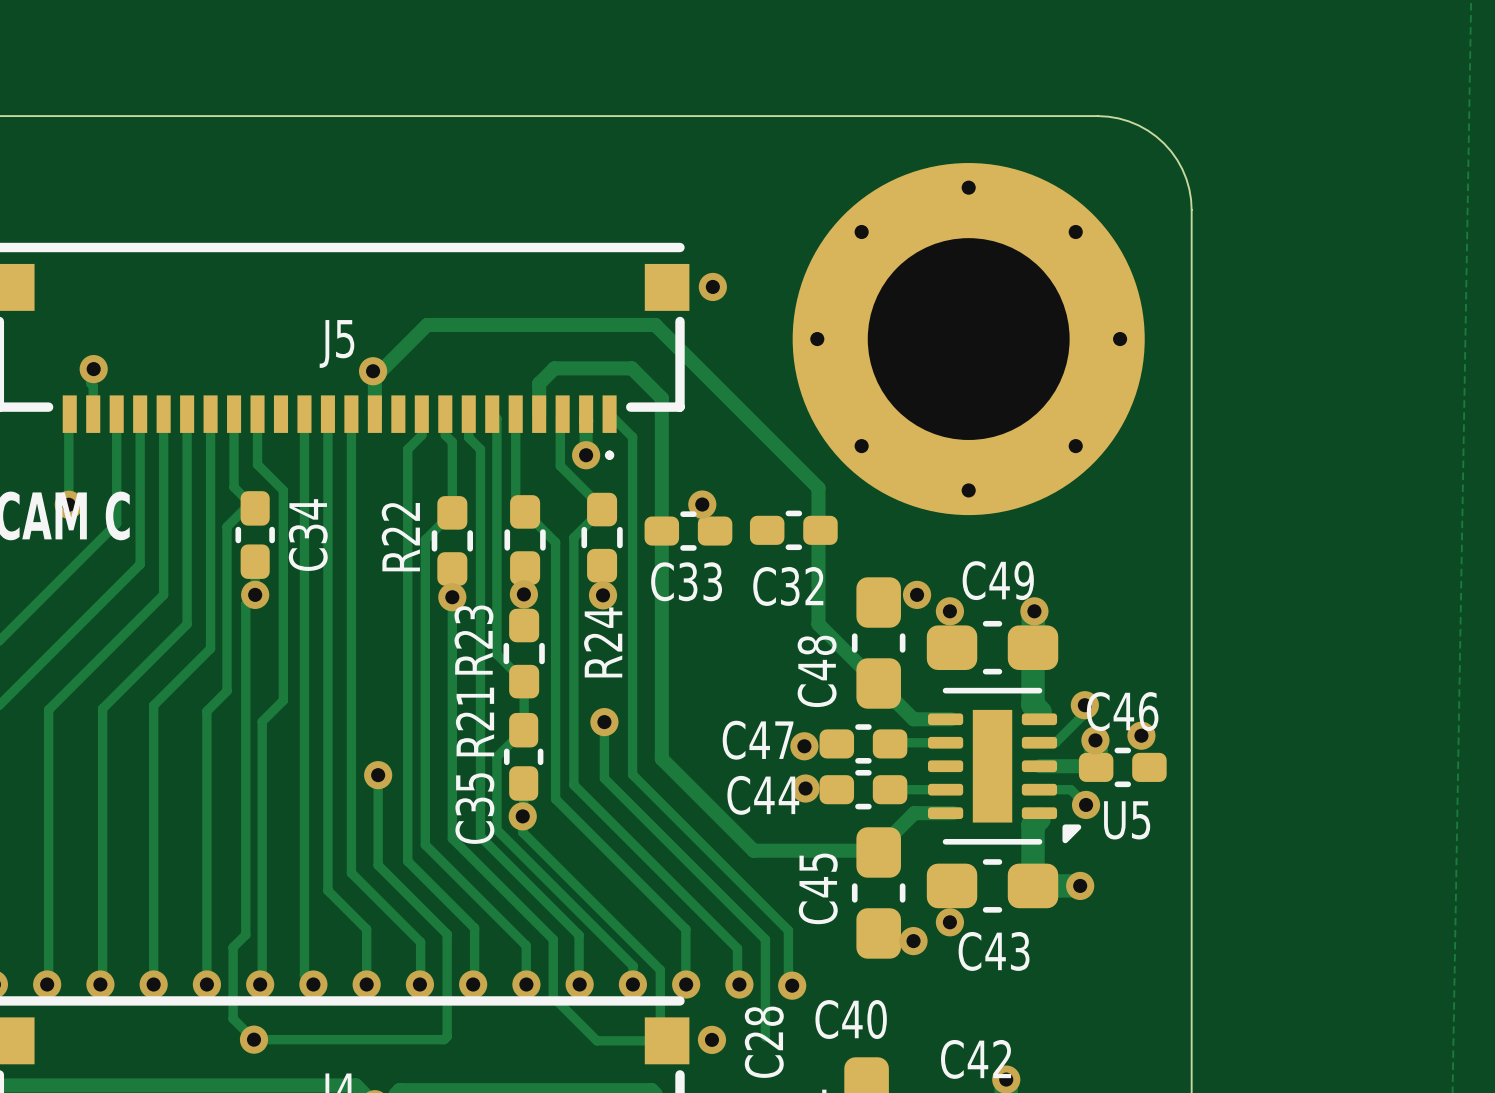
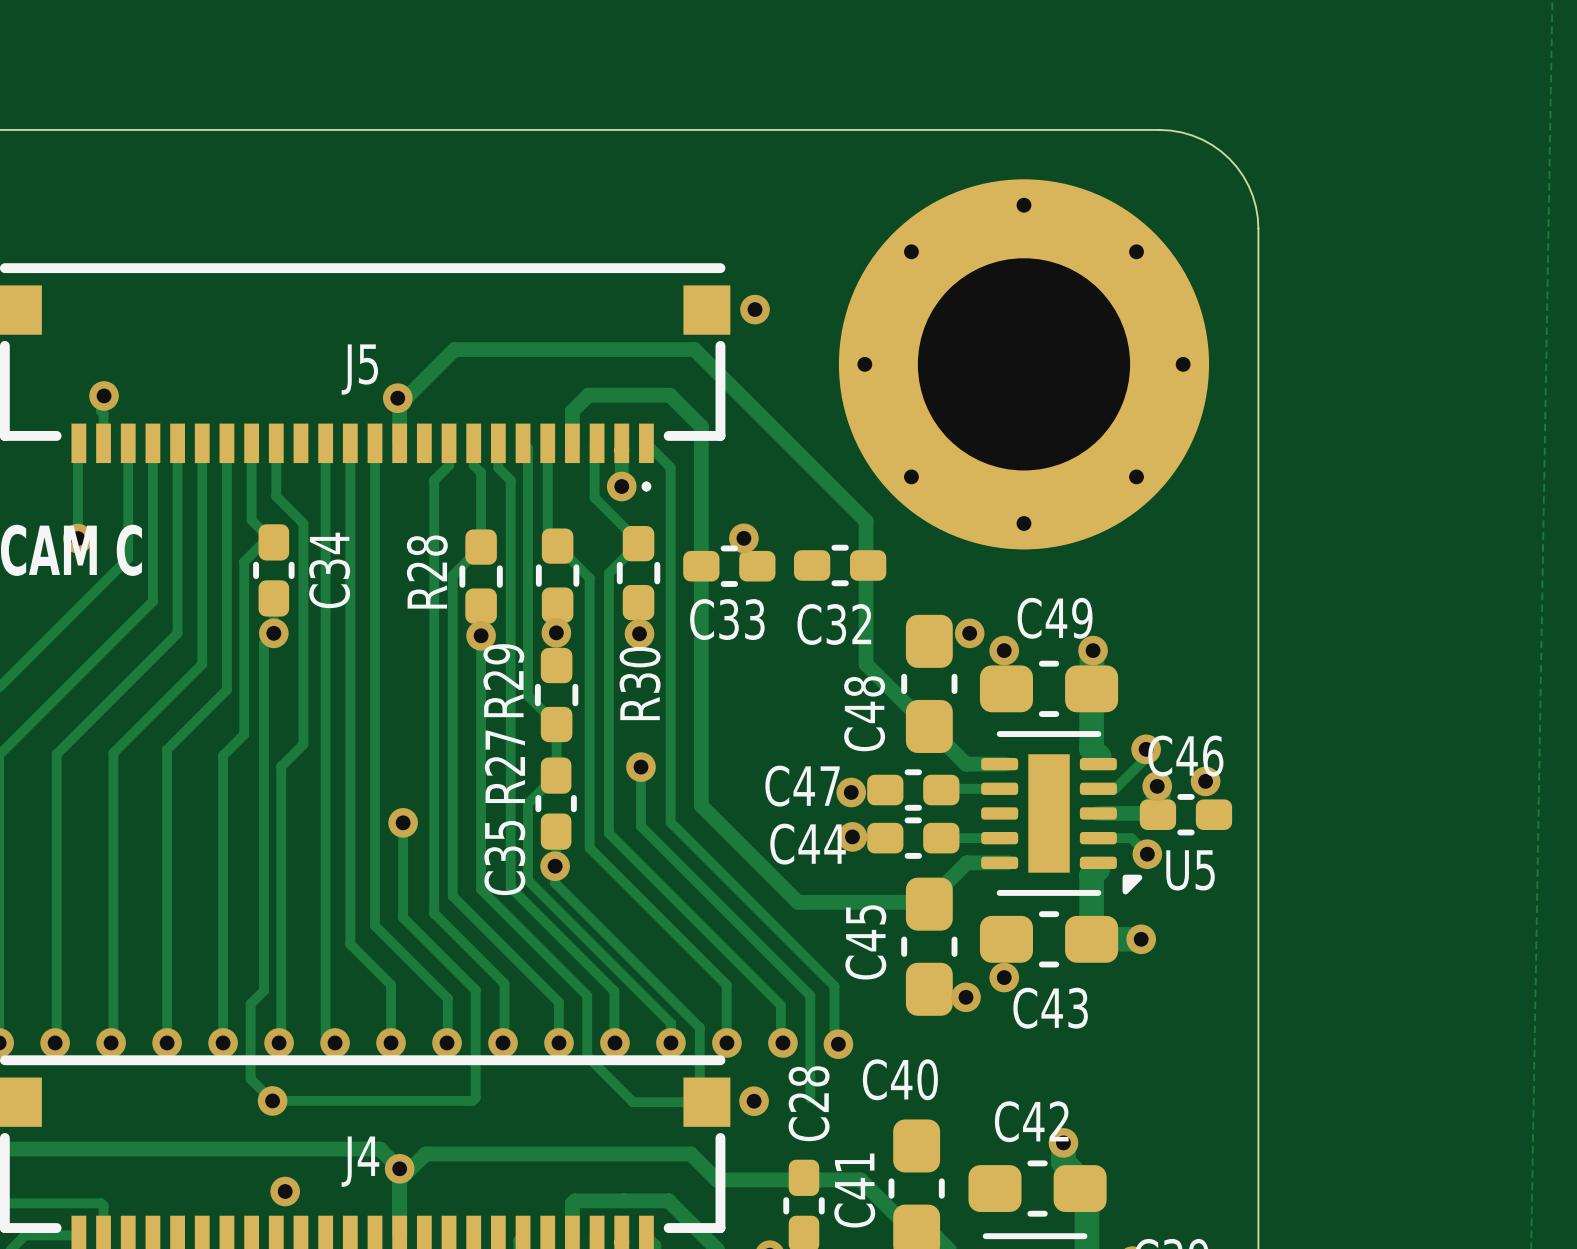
R22 name: R22 (400, 537) -> R28 (427, 572)
R23 name: R23 (473, 640) -> R29 (503, 680)
R24 name: R24 (603, 642) -> R30 (640, 683)
R21 name: R21 (475, 721) -> R27 (504, 766)

